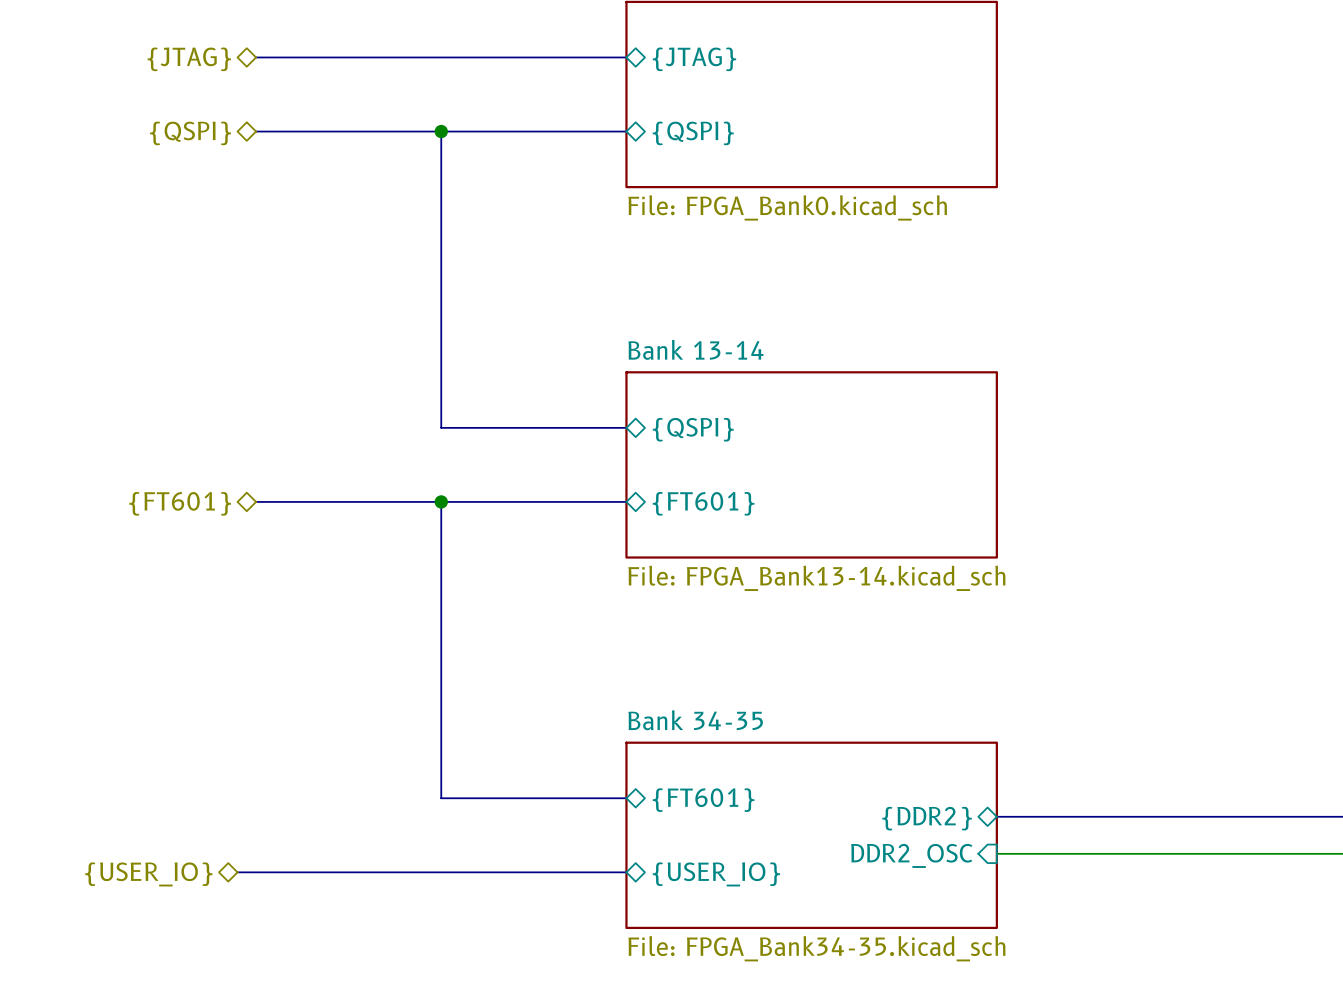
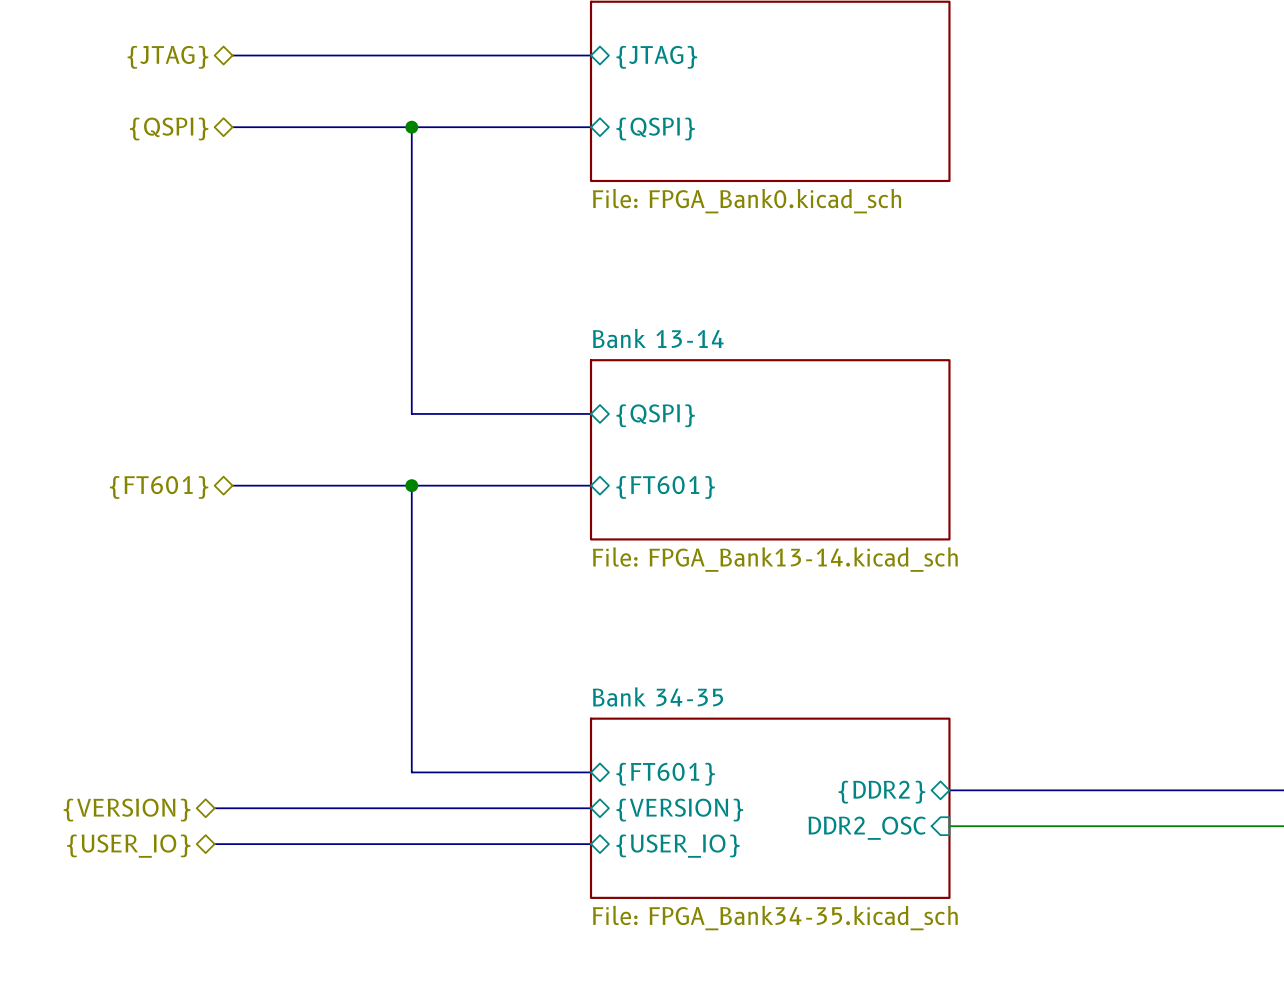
bus: none -> (214, 808) (591, 808)
hierarchical label: none -> {VERSION} (127, 810)
sheet pin: none -> {VERSION} (679, 810)

